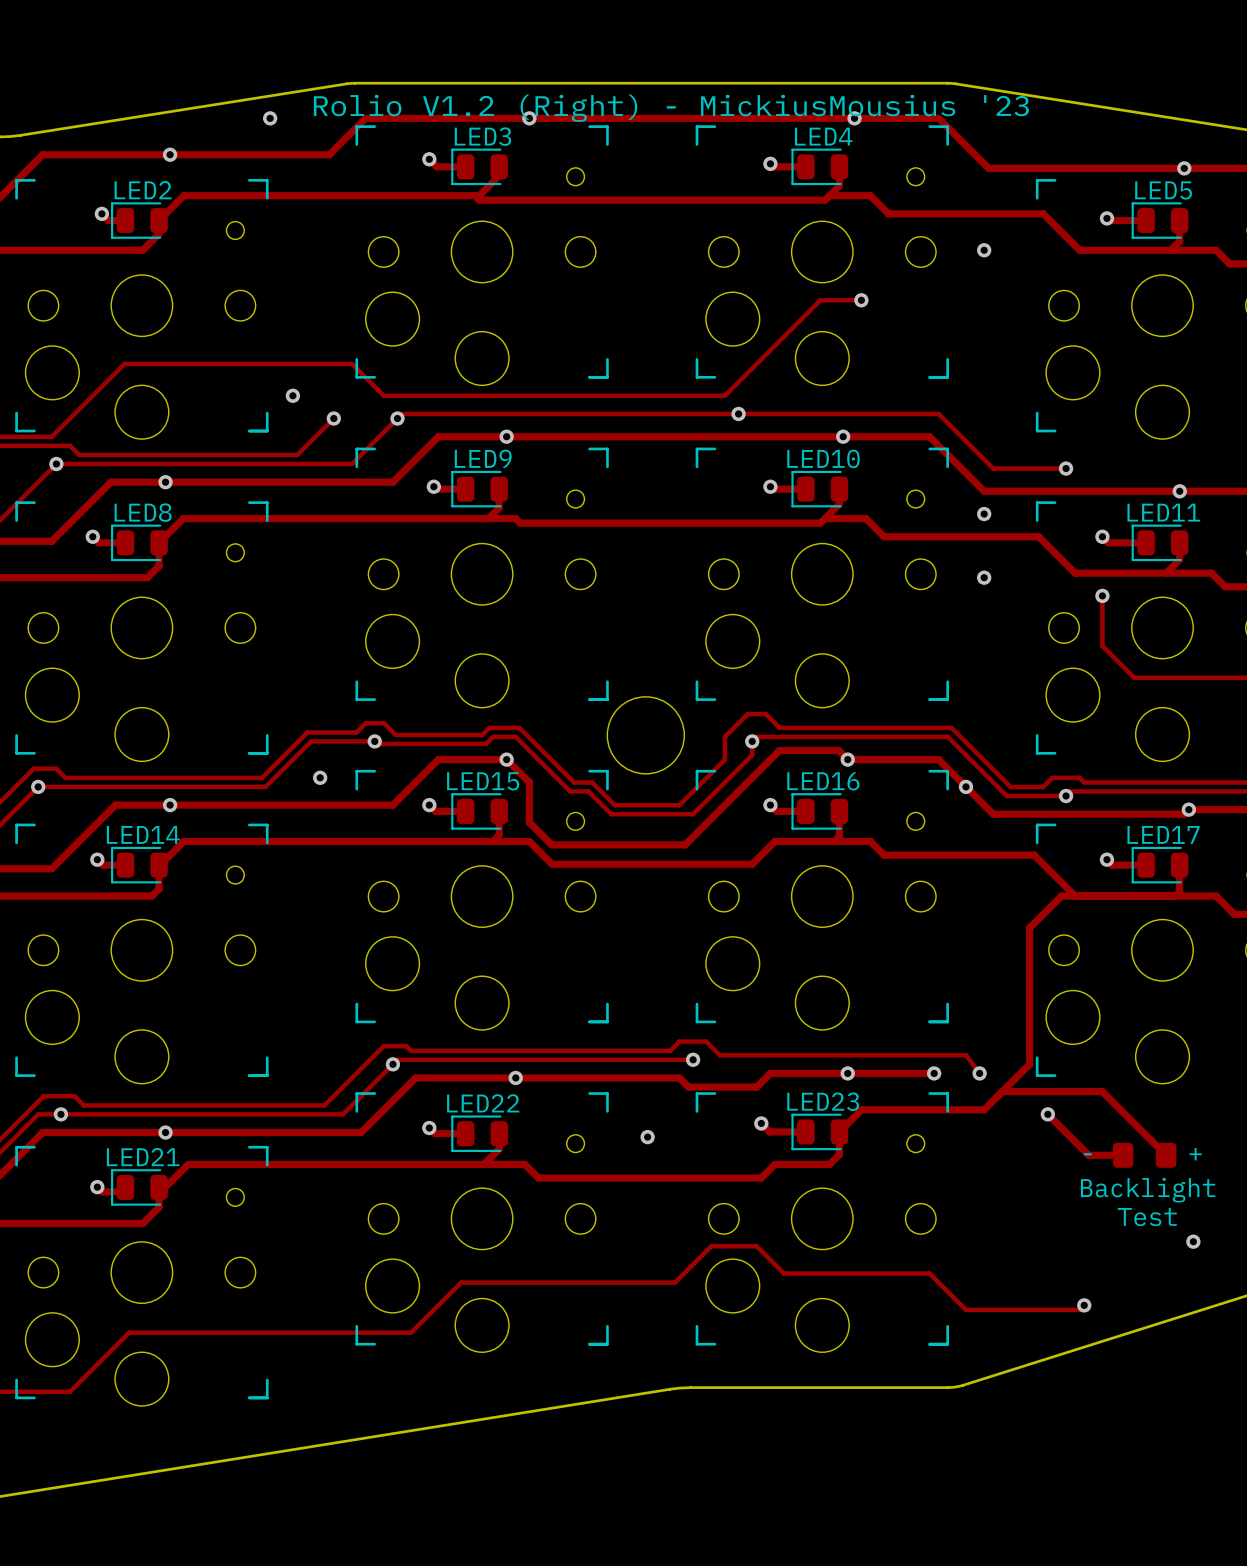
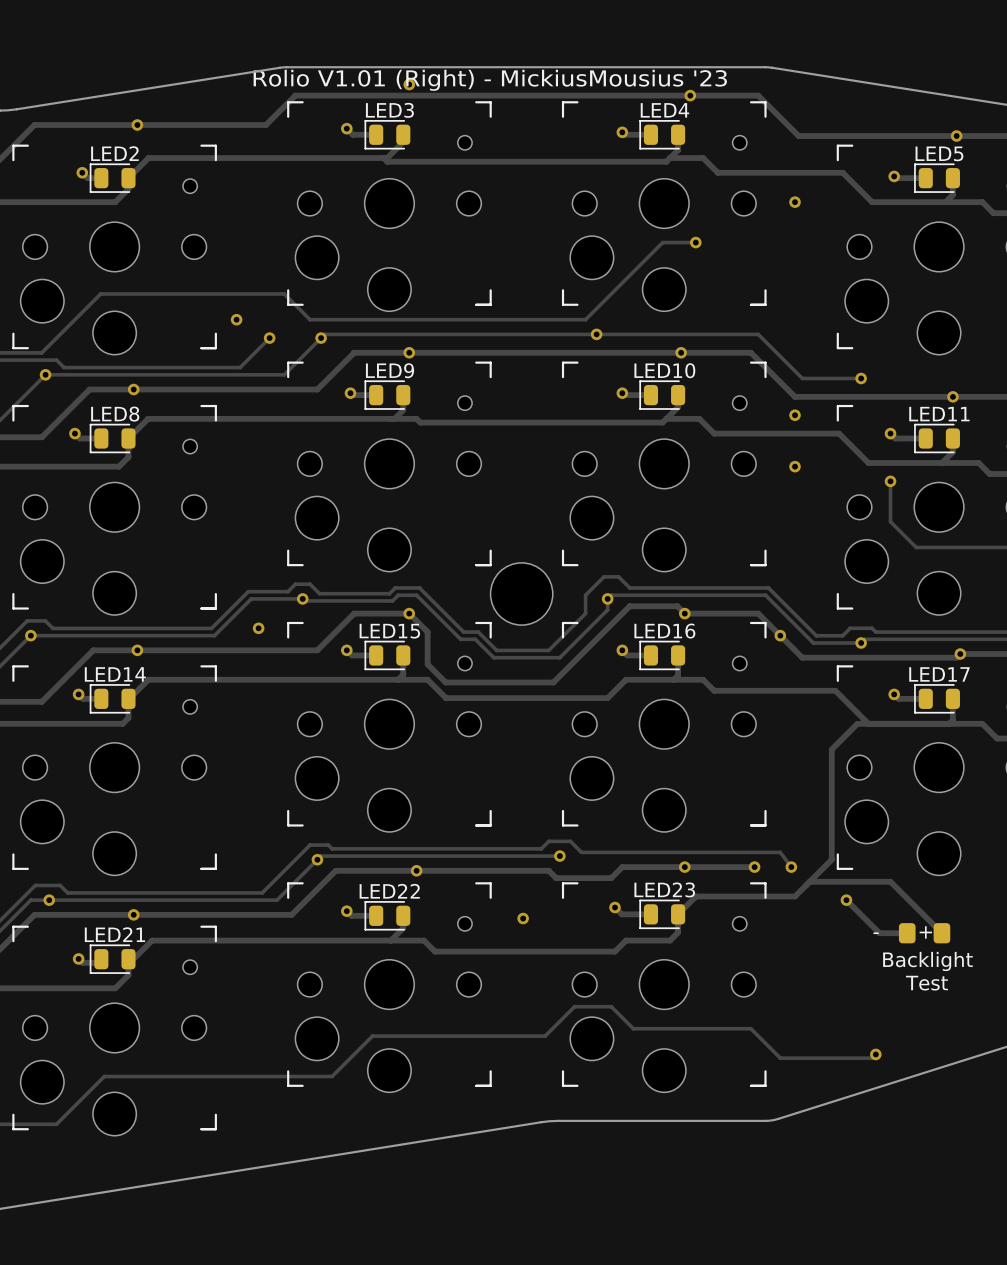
text: Rolio V1.2 (Right) - MickiusMousius '23 (671, 108) -> Rolio V1.01 (Right) - MickiusMousius '23 (490, 80)
via: (270, 118) -> none
via position: (529, 118) -> (409, 84)
via: (1193, 1241) -> none

